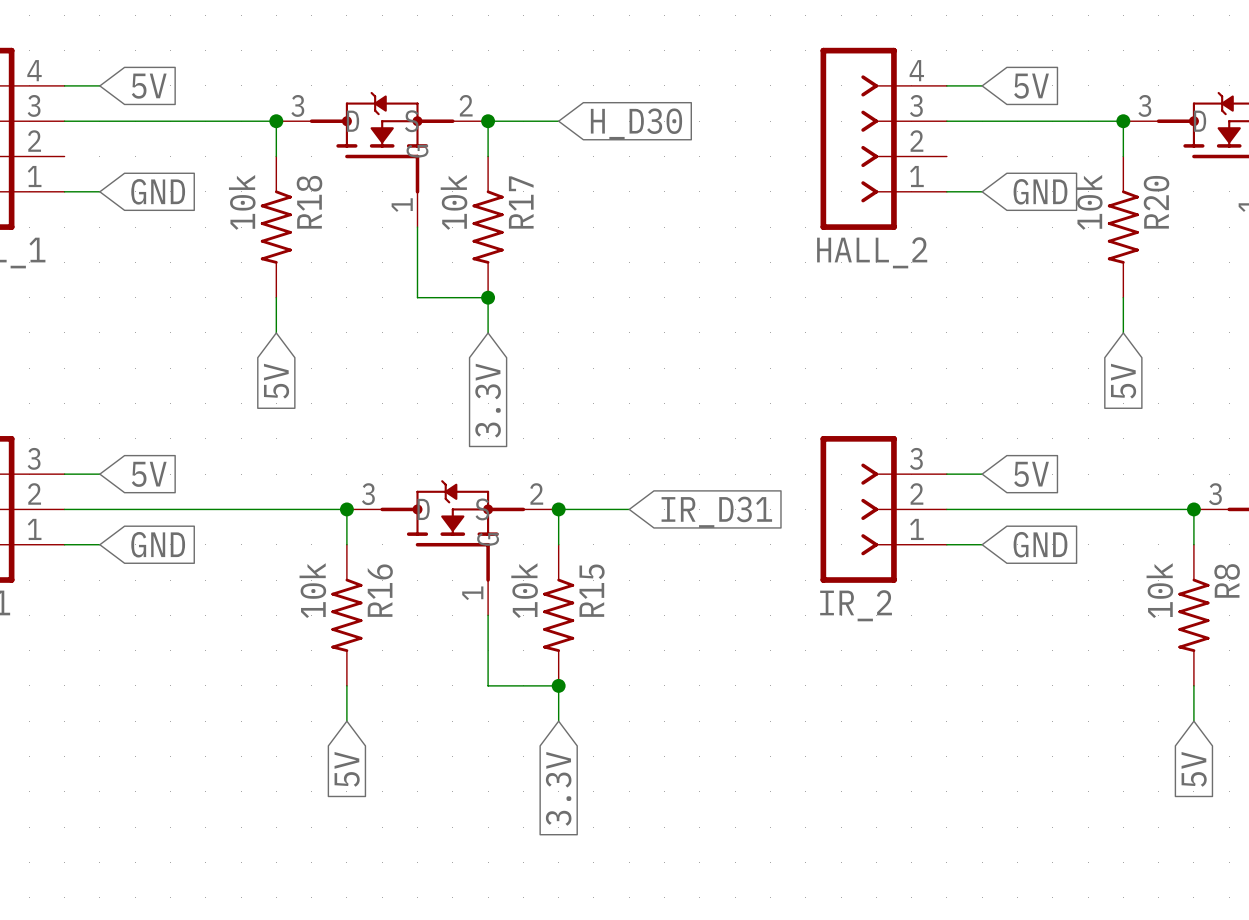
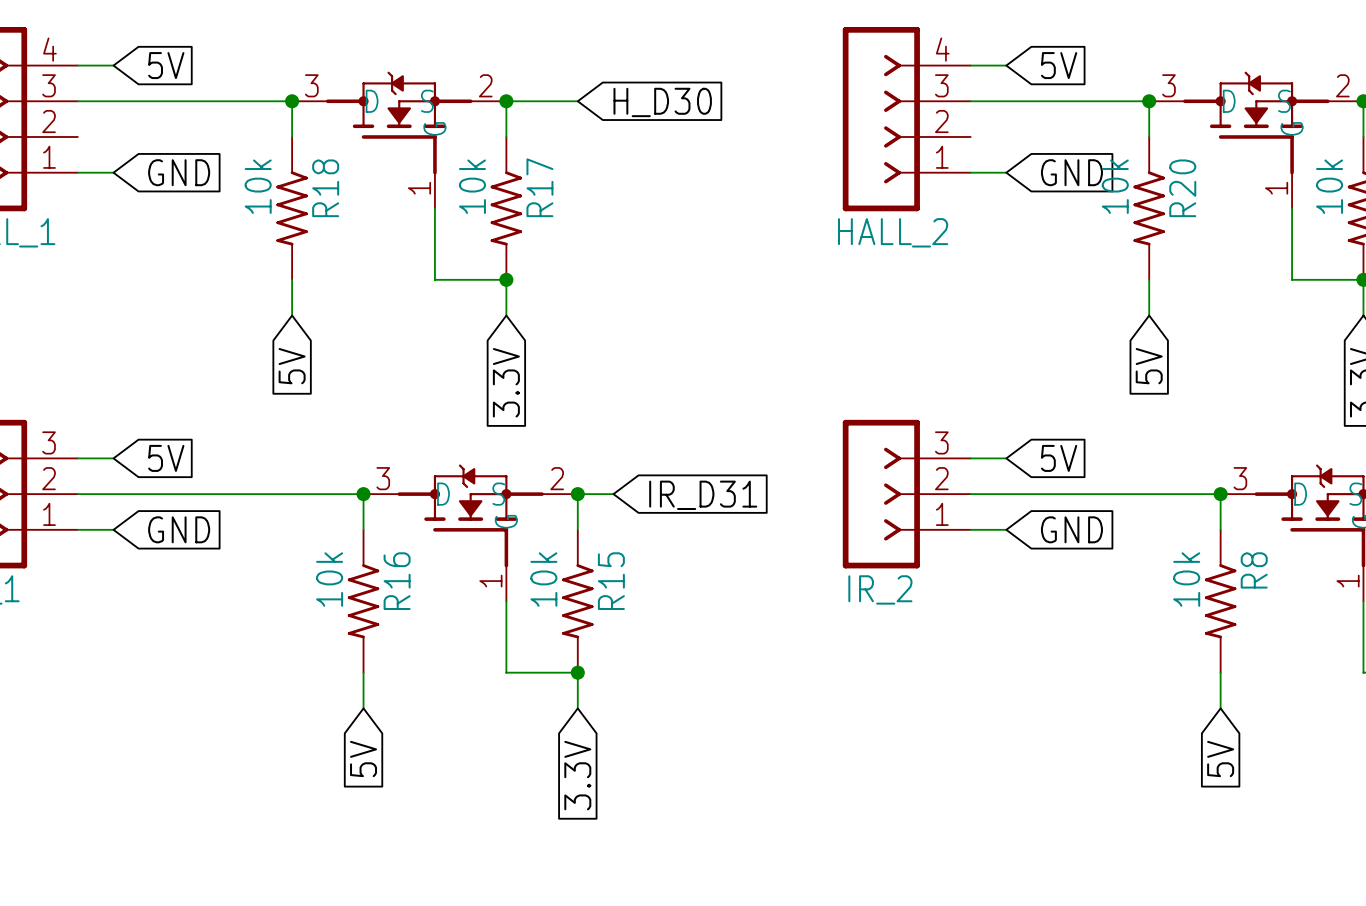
wire: (593, 509) (629, 509) -> none
global label position: IR_D31 (716, 512) -> IR_D31 (703, 495)

